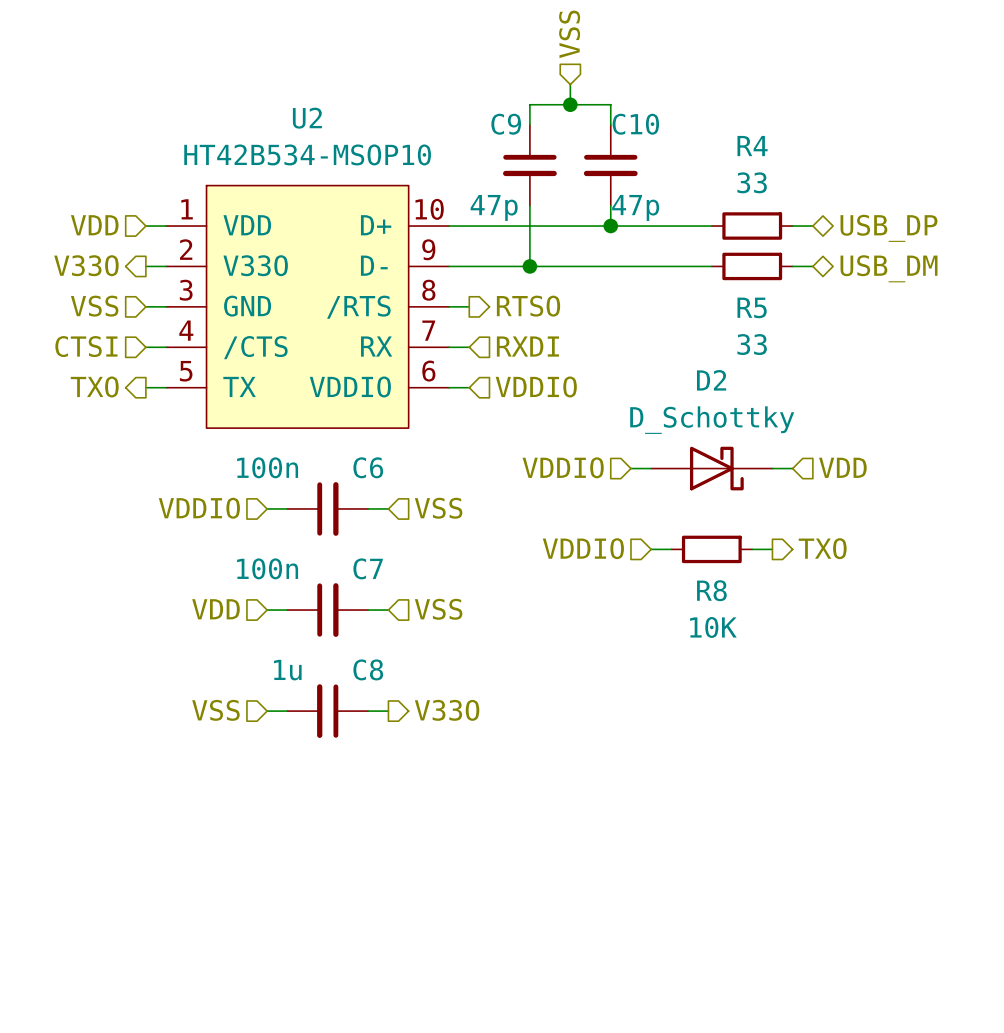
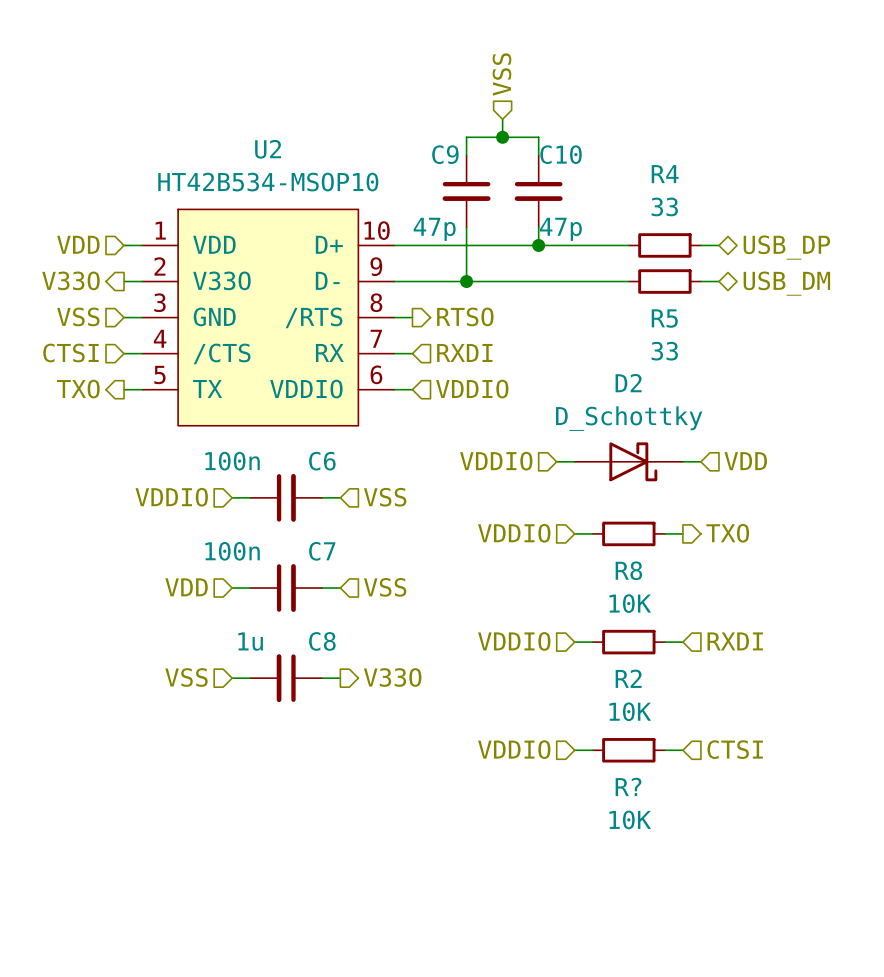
hierarchical label: none -> VDDIO (514, 641)
hierarchical label: none -> RXDI (735, 641)
wire: none -> (574, 642) (592, 642)
R2: none -> 10K (628, 642)
wire: none -> (664, 642) (682, 642)
hierarchical label: none -> VDDIO (514, 749)
wire: none -> (574, 750) (592, 750)
R?: none -> 10K (628, 750)
wire: none -> (664, 750) (682, 750)
hierarchical label: none -> CTSI (735, 749)

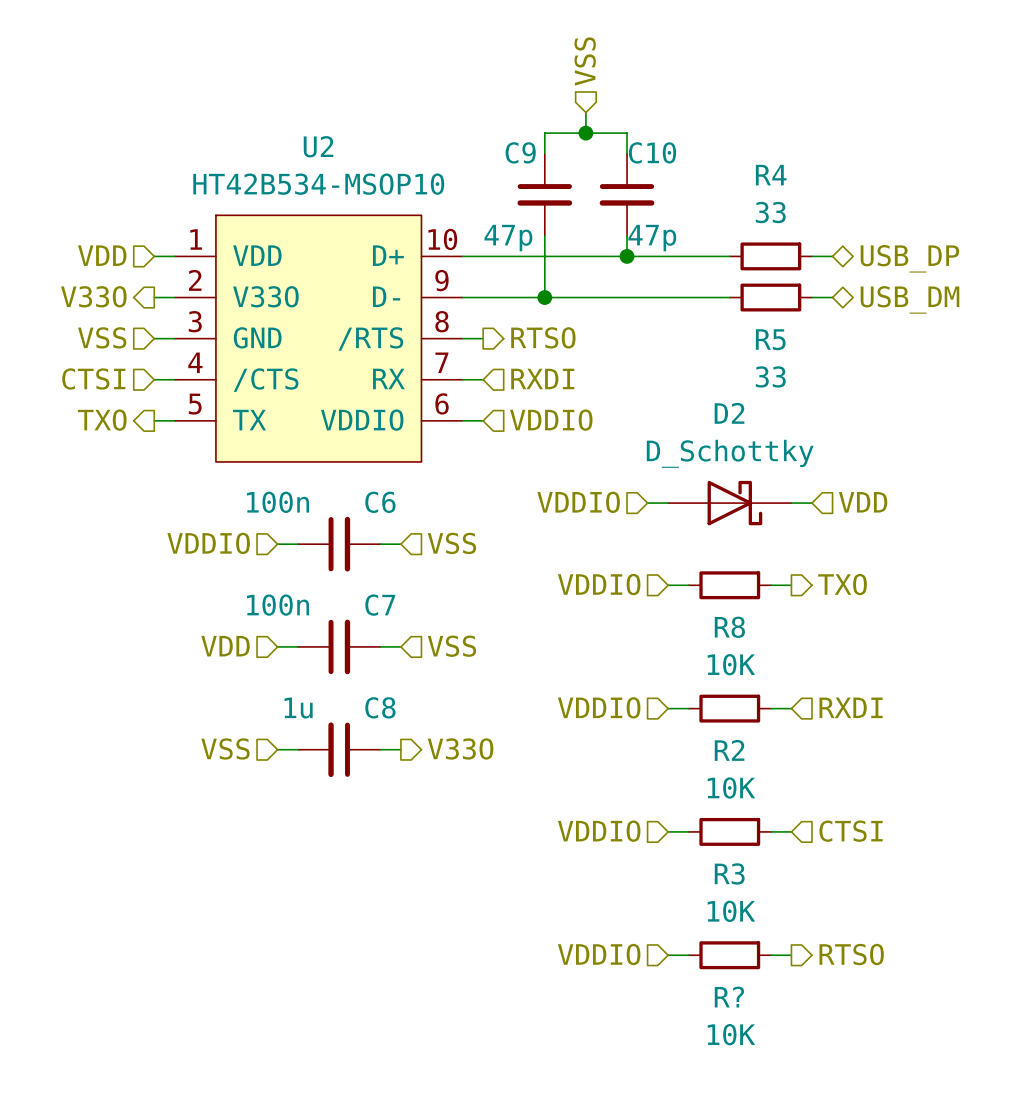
R? name: R? (628, 786) -> R3 (729, 873)
hierarchical label: none -> VDDIO (599, 954)
hierarchical label: none -> RTSO (851, 954)
wire: none -> (668, 955) (688, 955)
R?: none -> 10K (729, 955)
wire: none -> (770, 955) (791, 955)

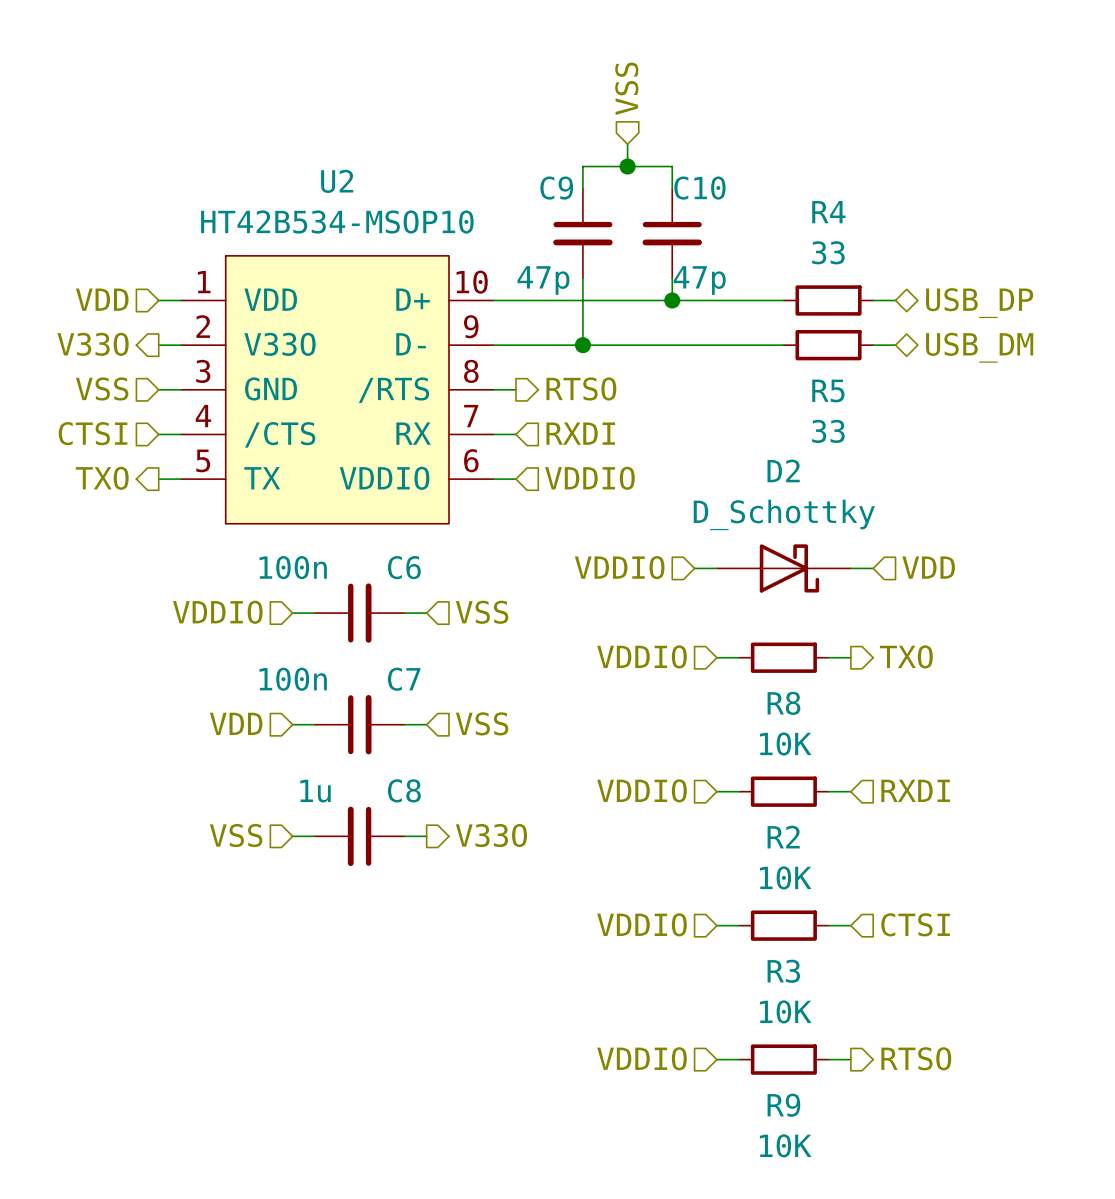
R? name: R? (729, 997) -> R9 (783, 1105)

